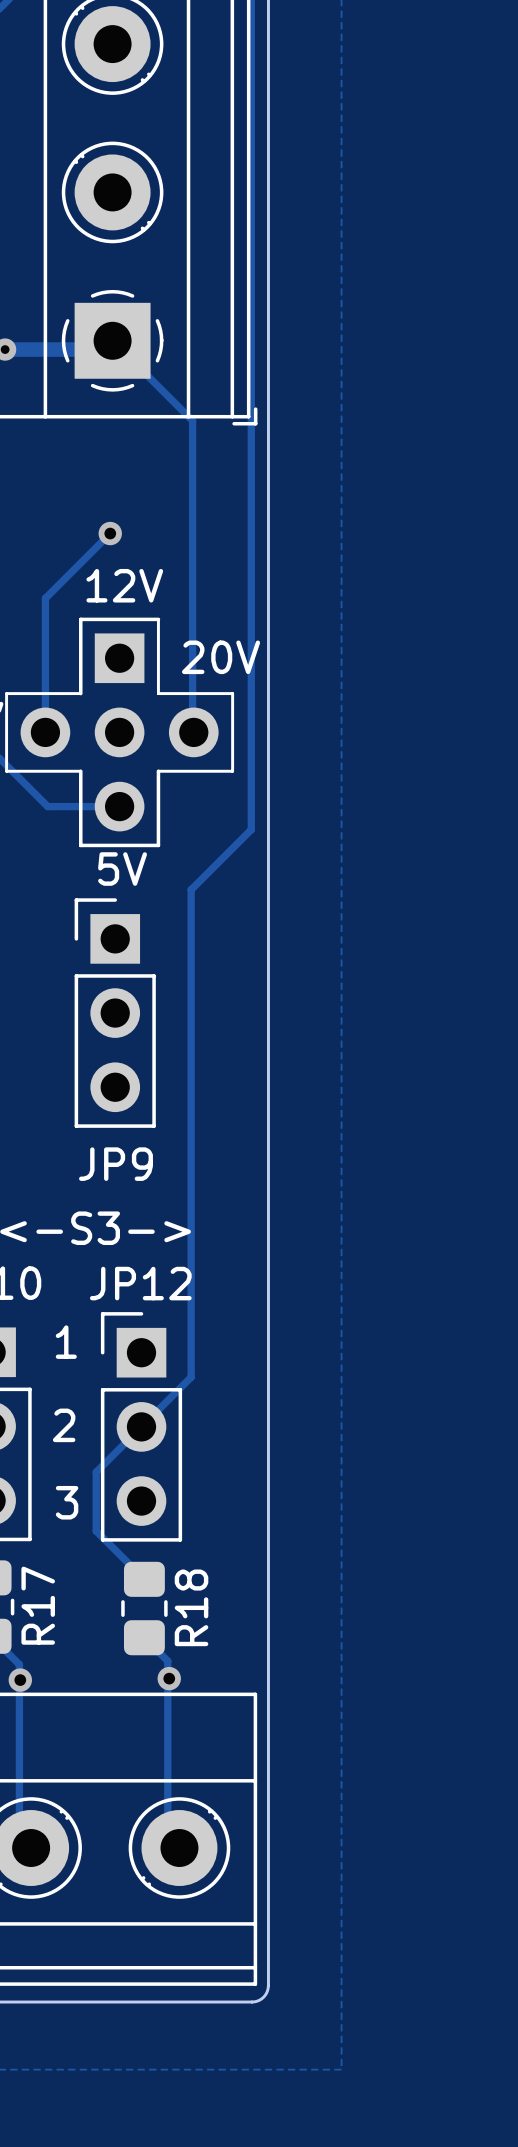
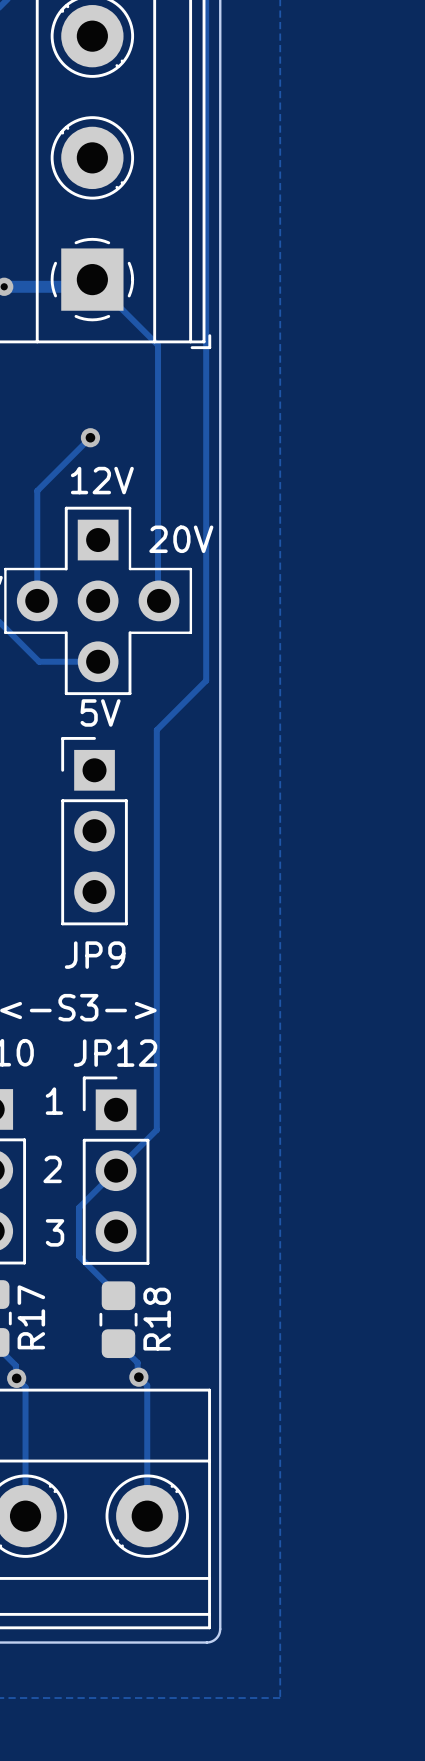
track: none -> (138, 1377) (147, 1385) (147, 1516)
track: (19, 1680) (19, 1848) -> none
track: none -> (16, 1378) (25, 1387) (25, 1516)
track: (167, 1680) (167, 1848) -> none

